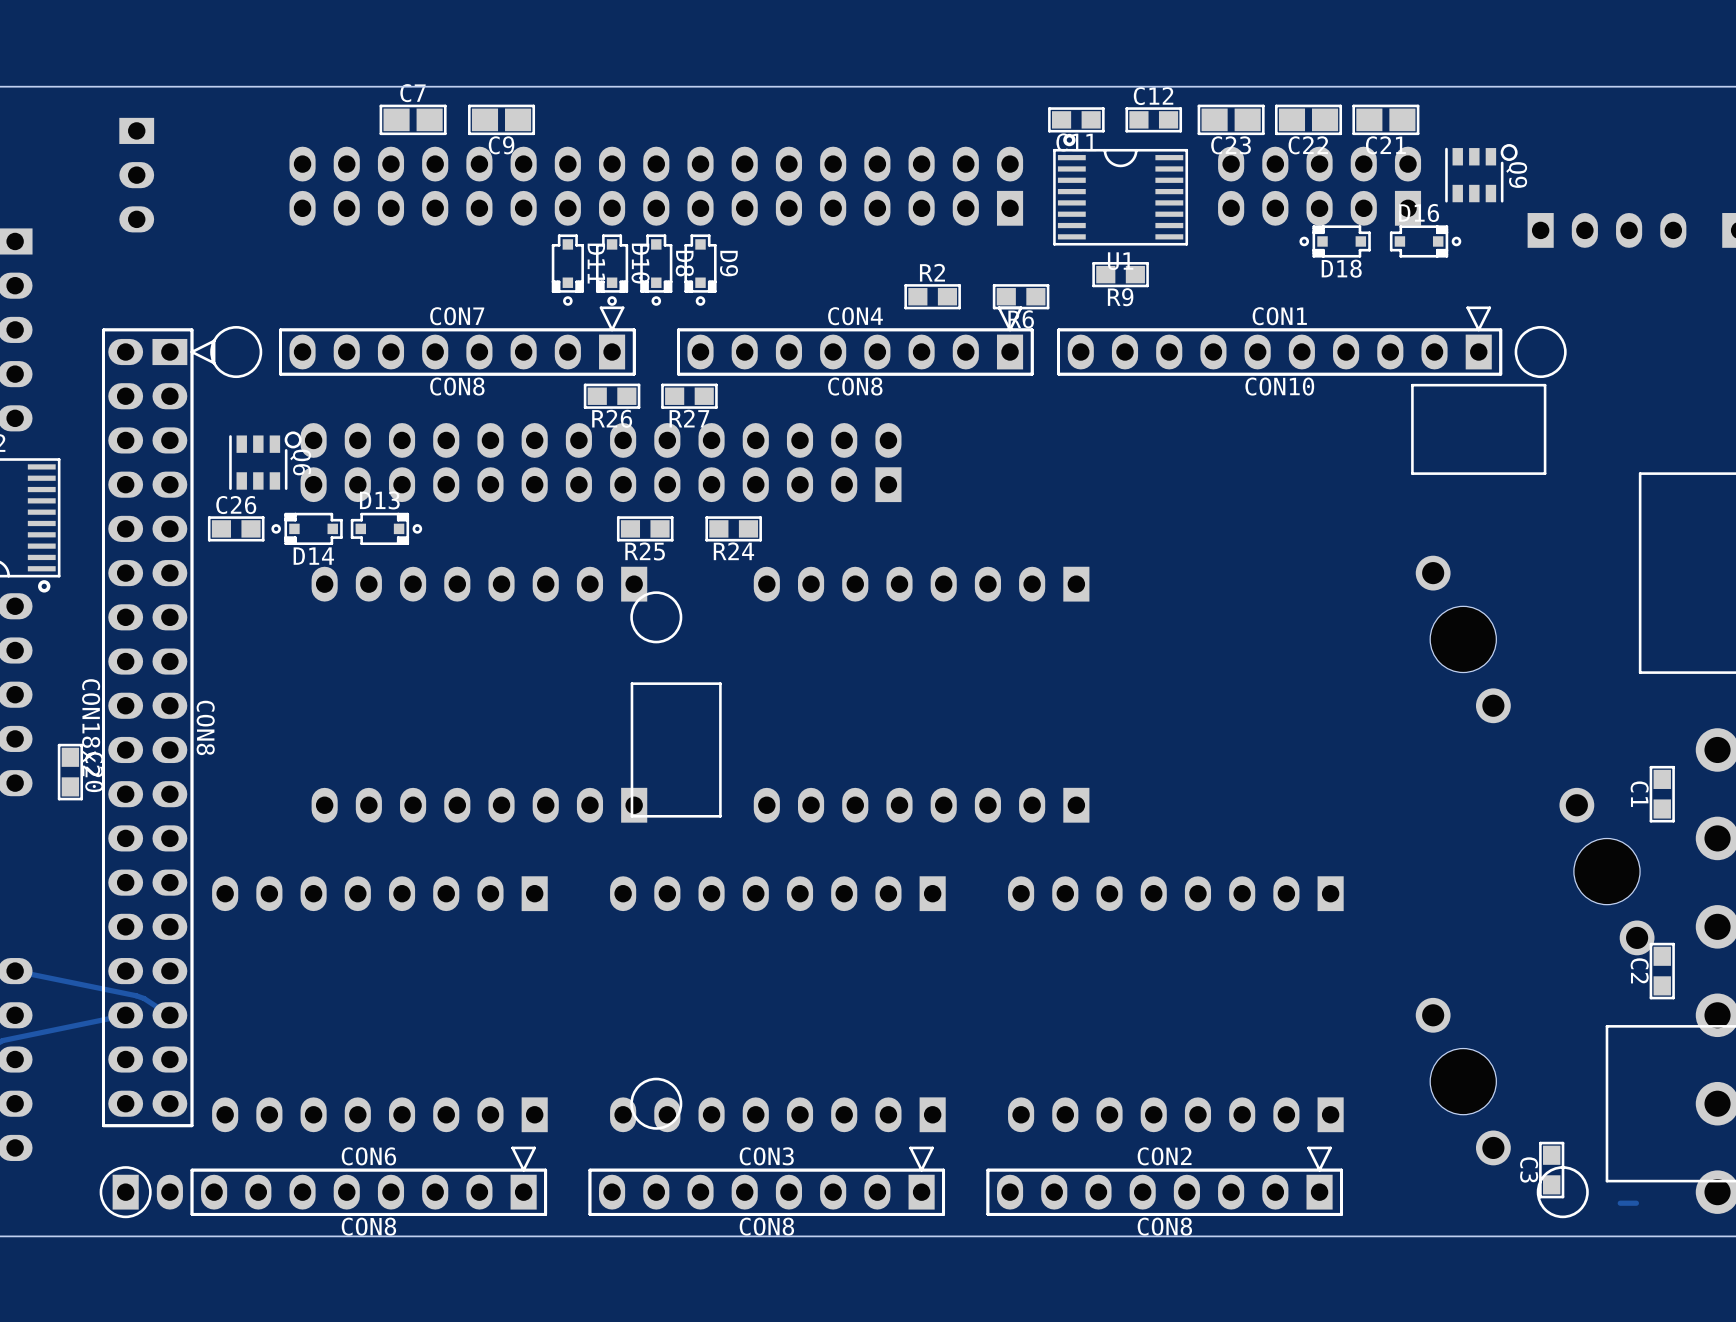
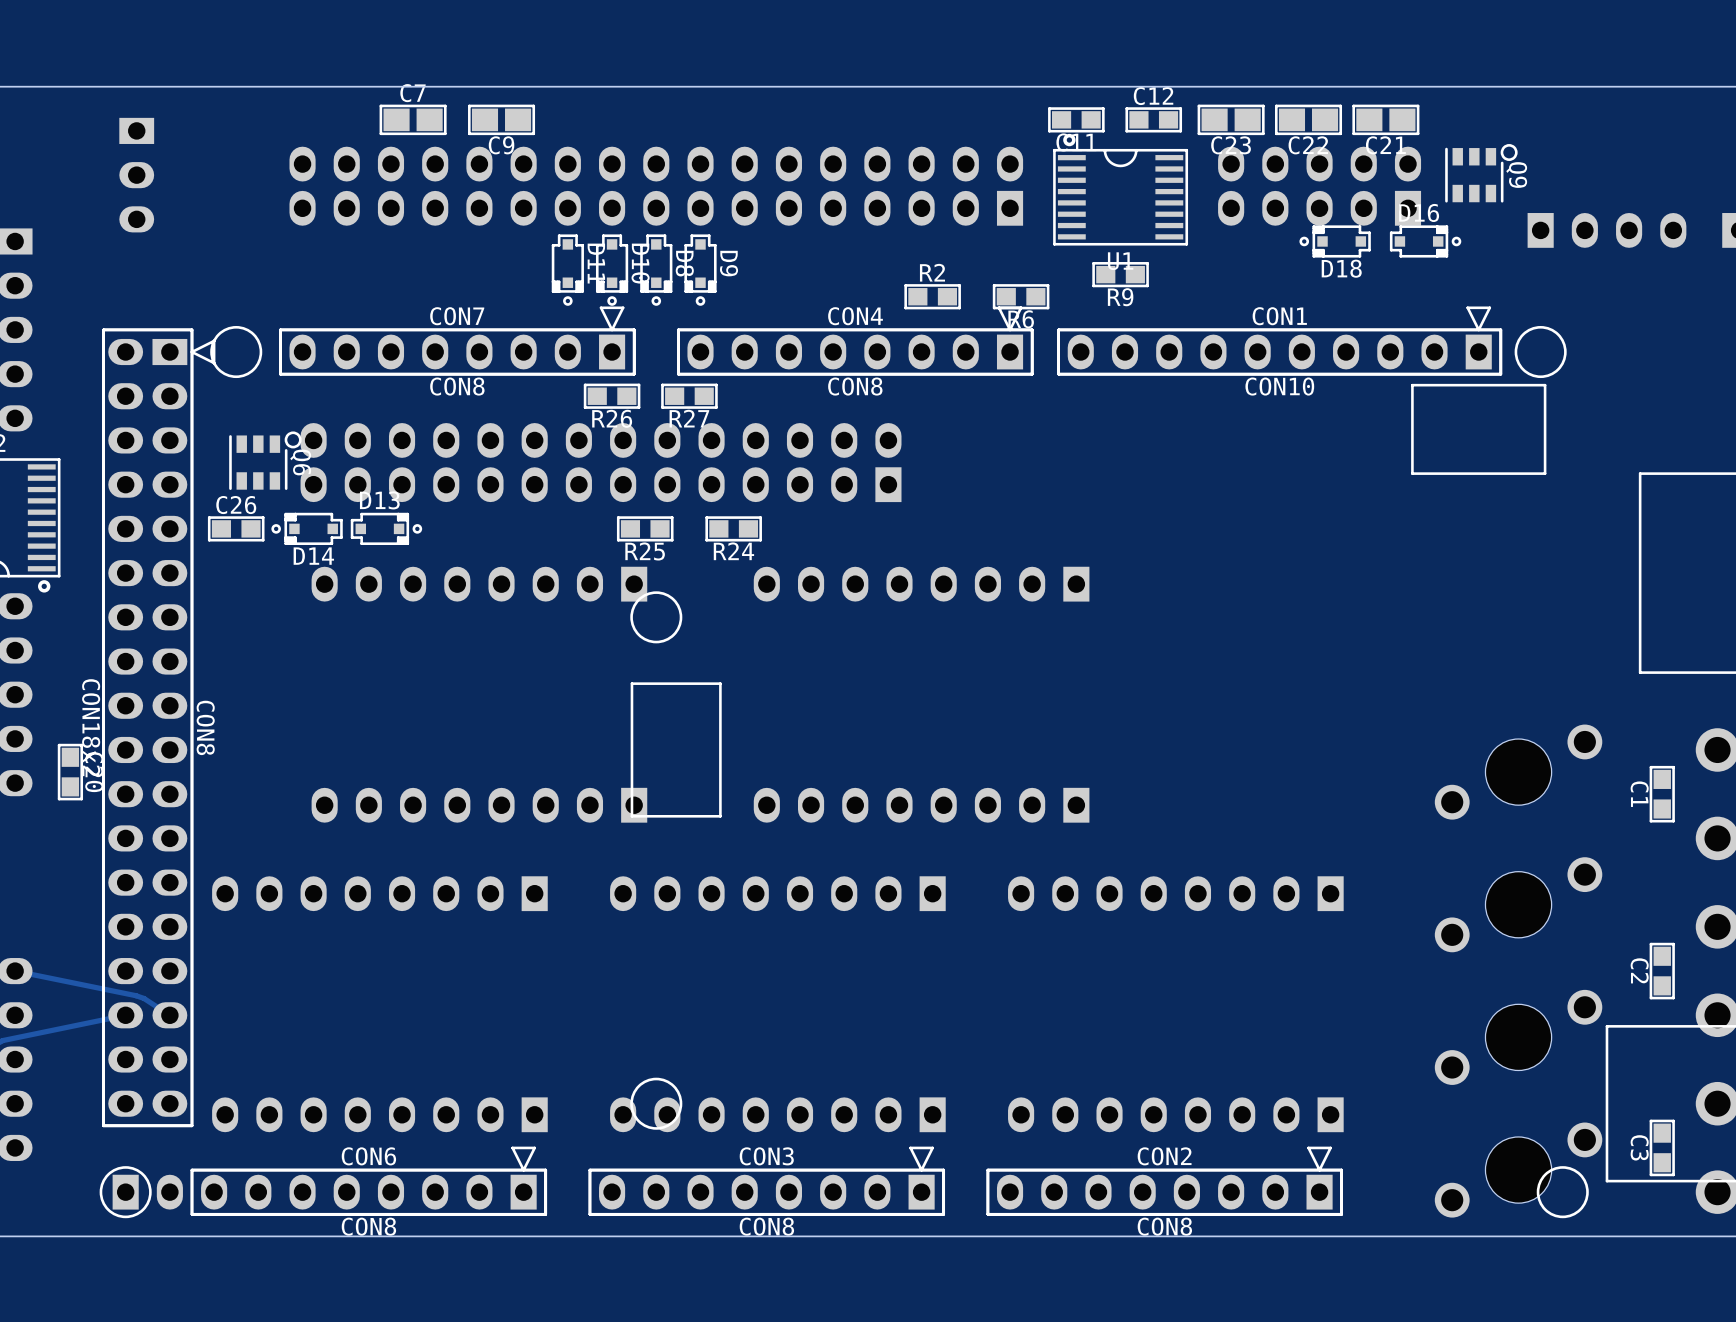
part: (1463, 639) -> none
part: none -> (1518, 772)
part: (1606, 871) -> none
part: none -> (1518, 904)
part: none -> (1518, 1037)
part: (1463, 1081) -> none
part: none -> (1518, 1170)
C3 position: (1551, 1170) -> (1662, 1147)
track: (1636, 1203) (1620, 1203) -> none

